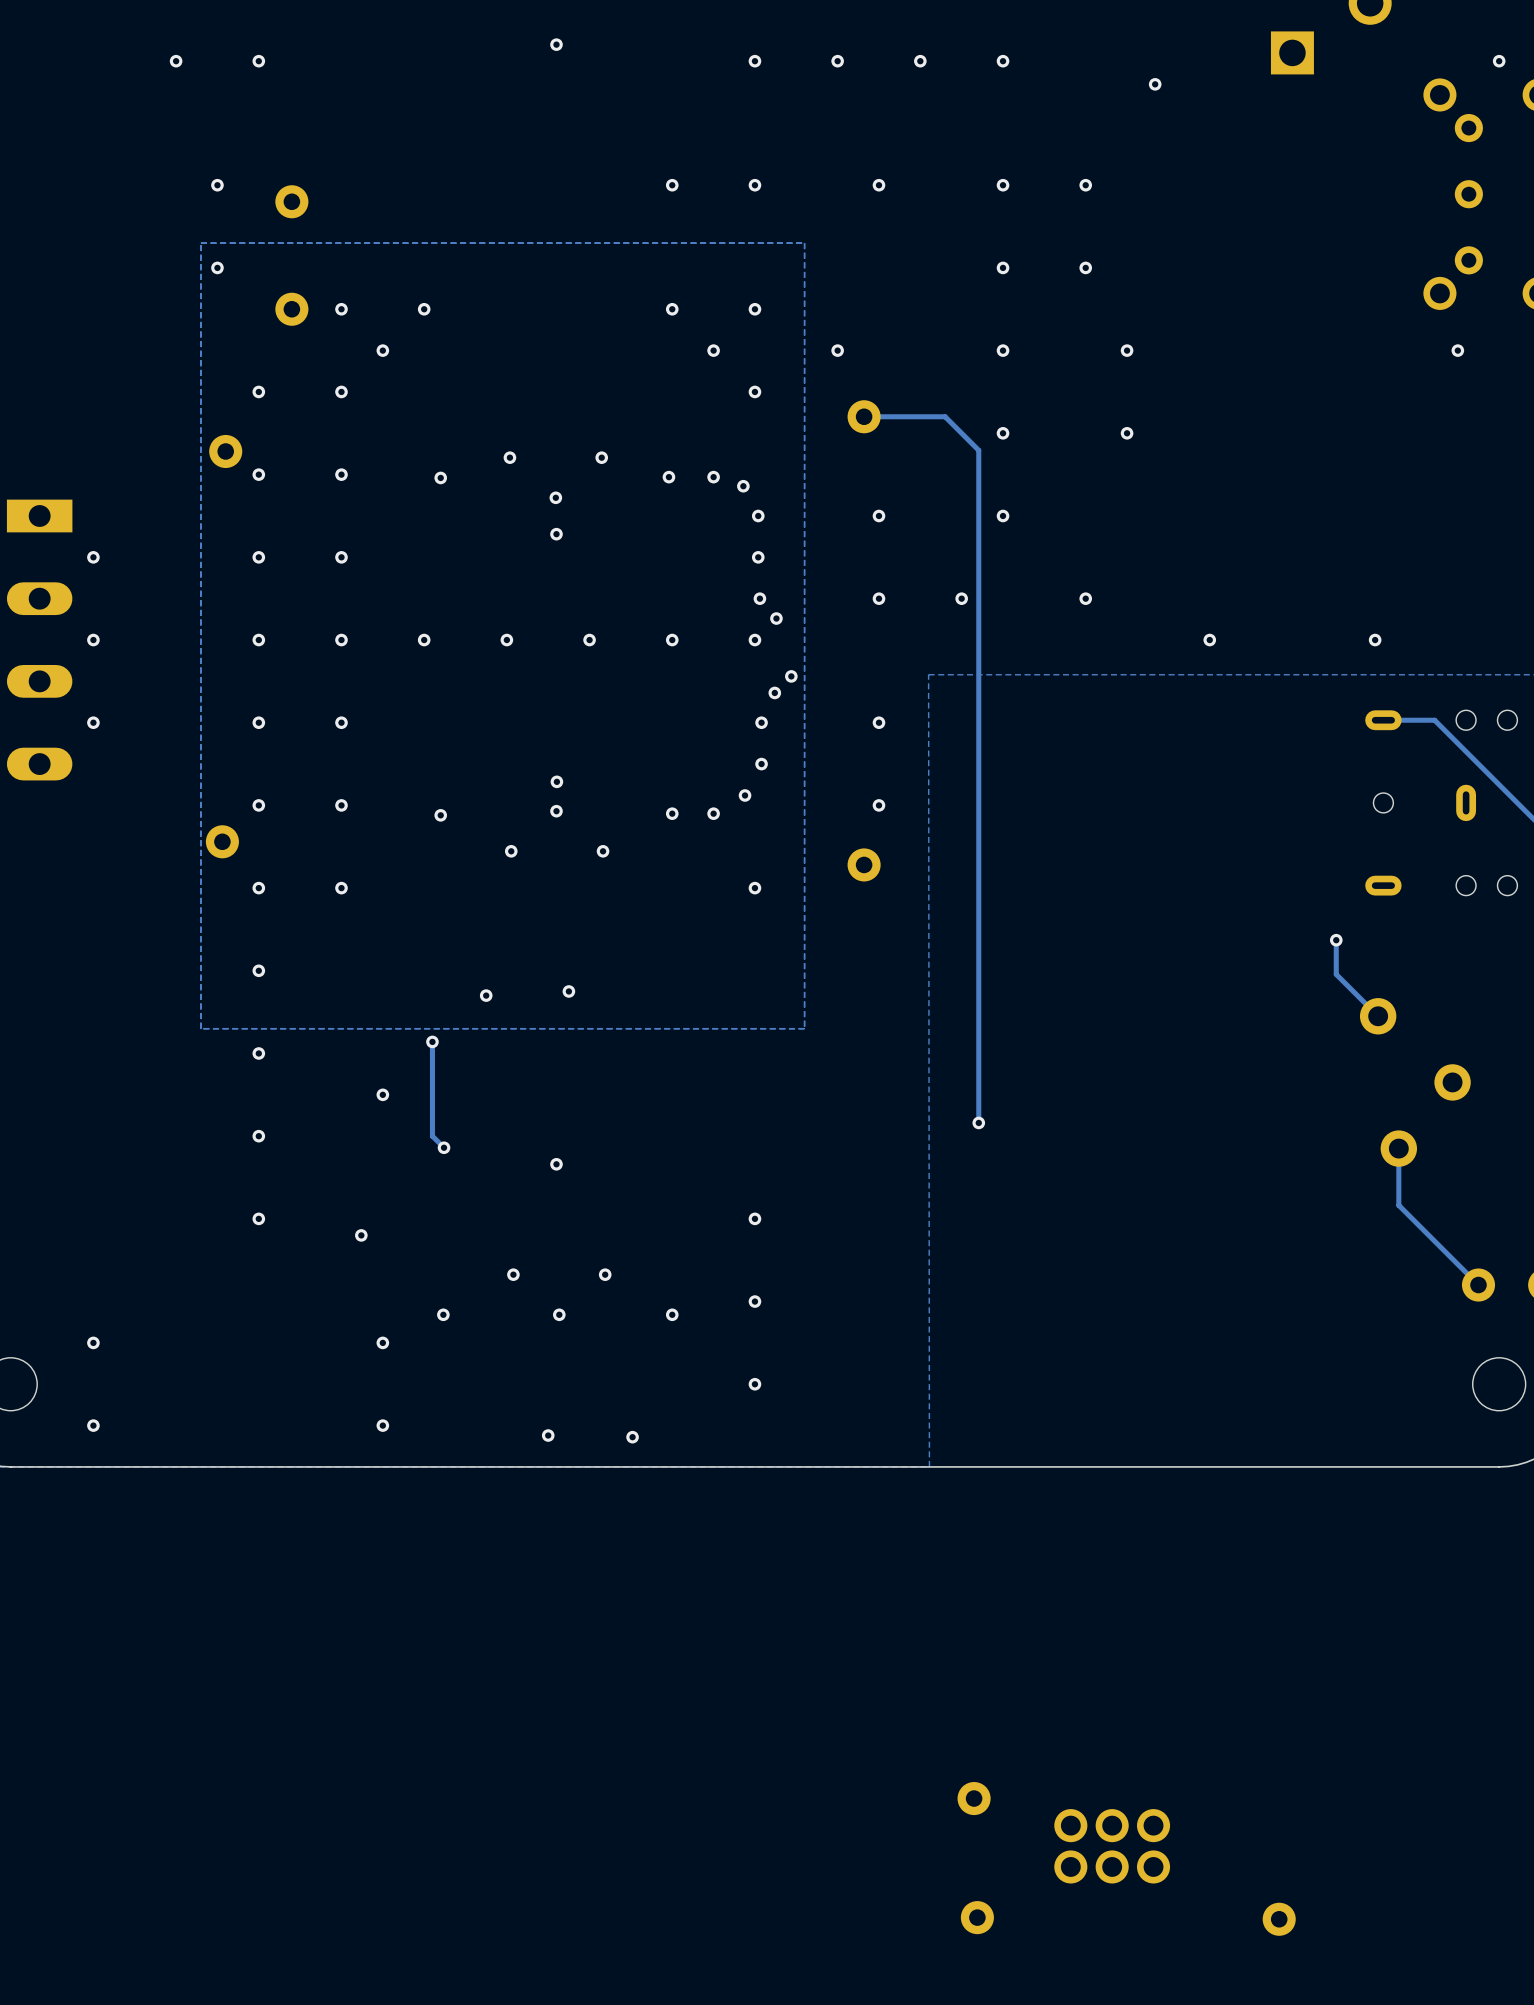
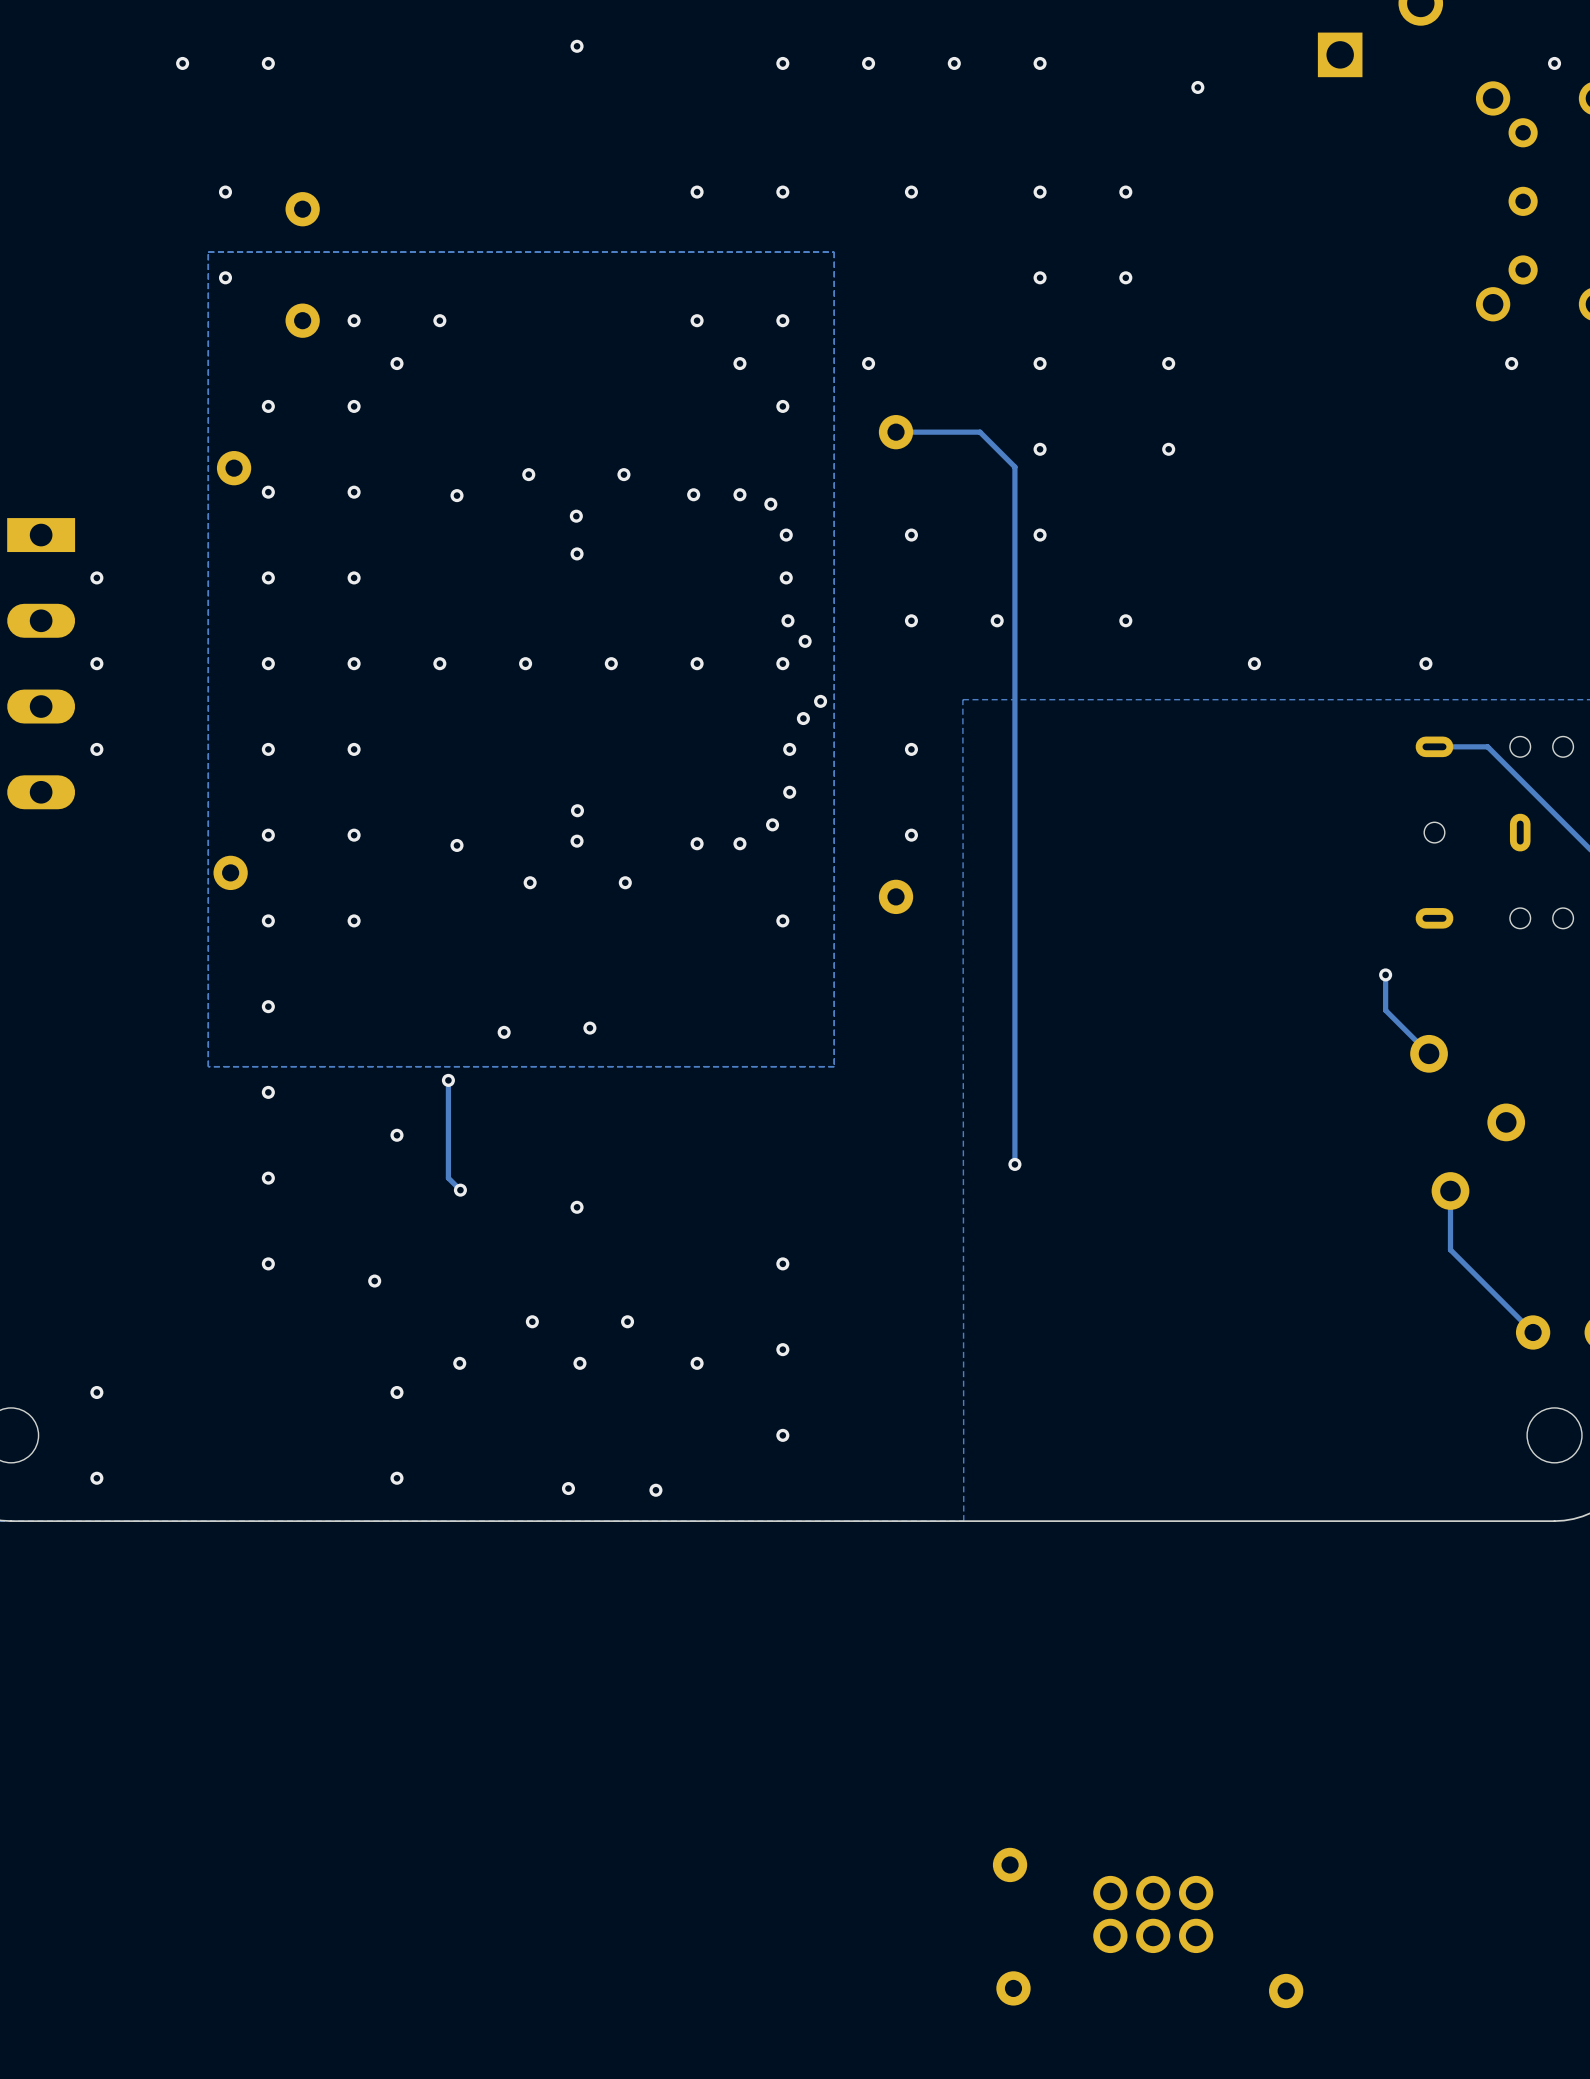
part position: (1279, 1919) -> (1286, 1991)

